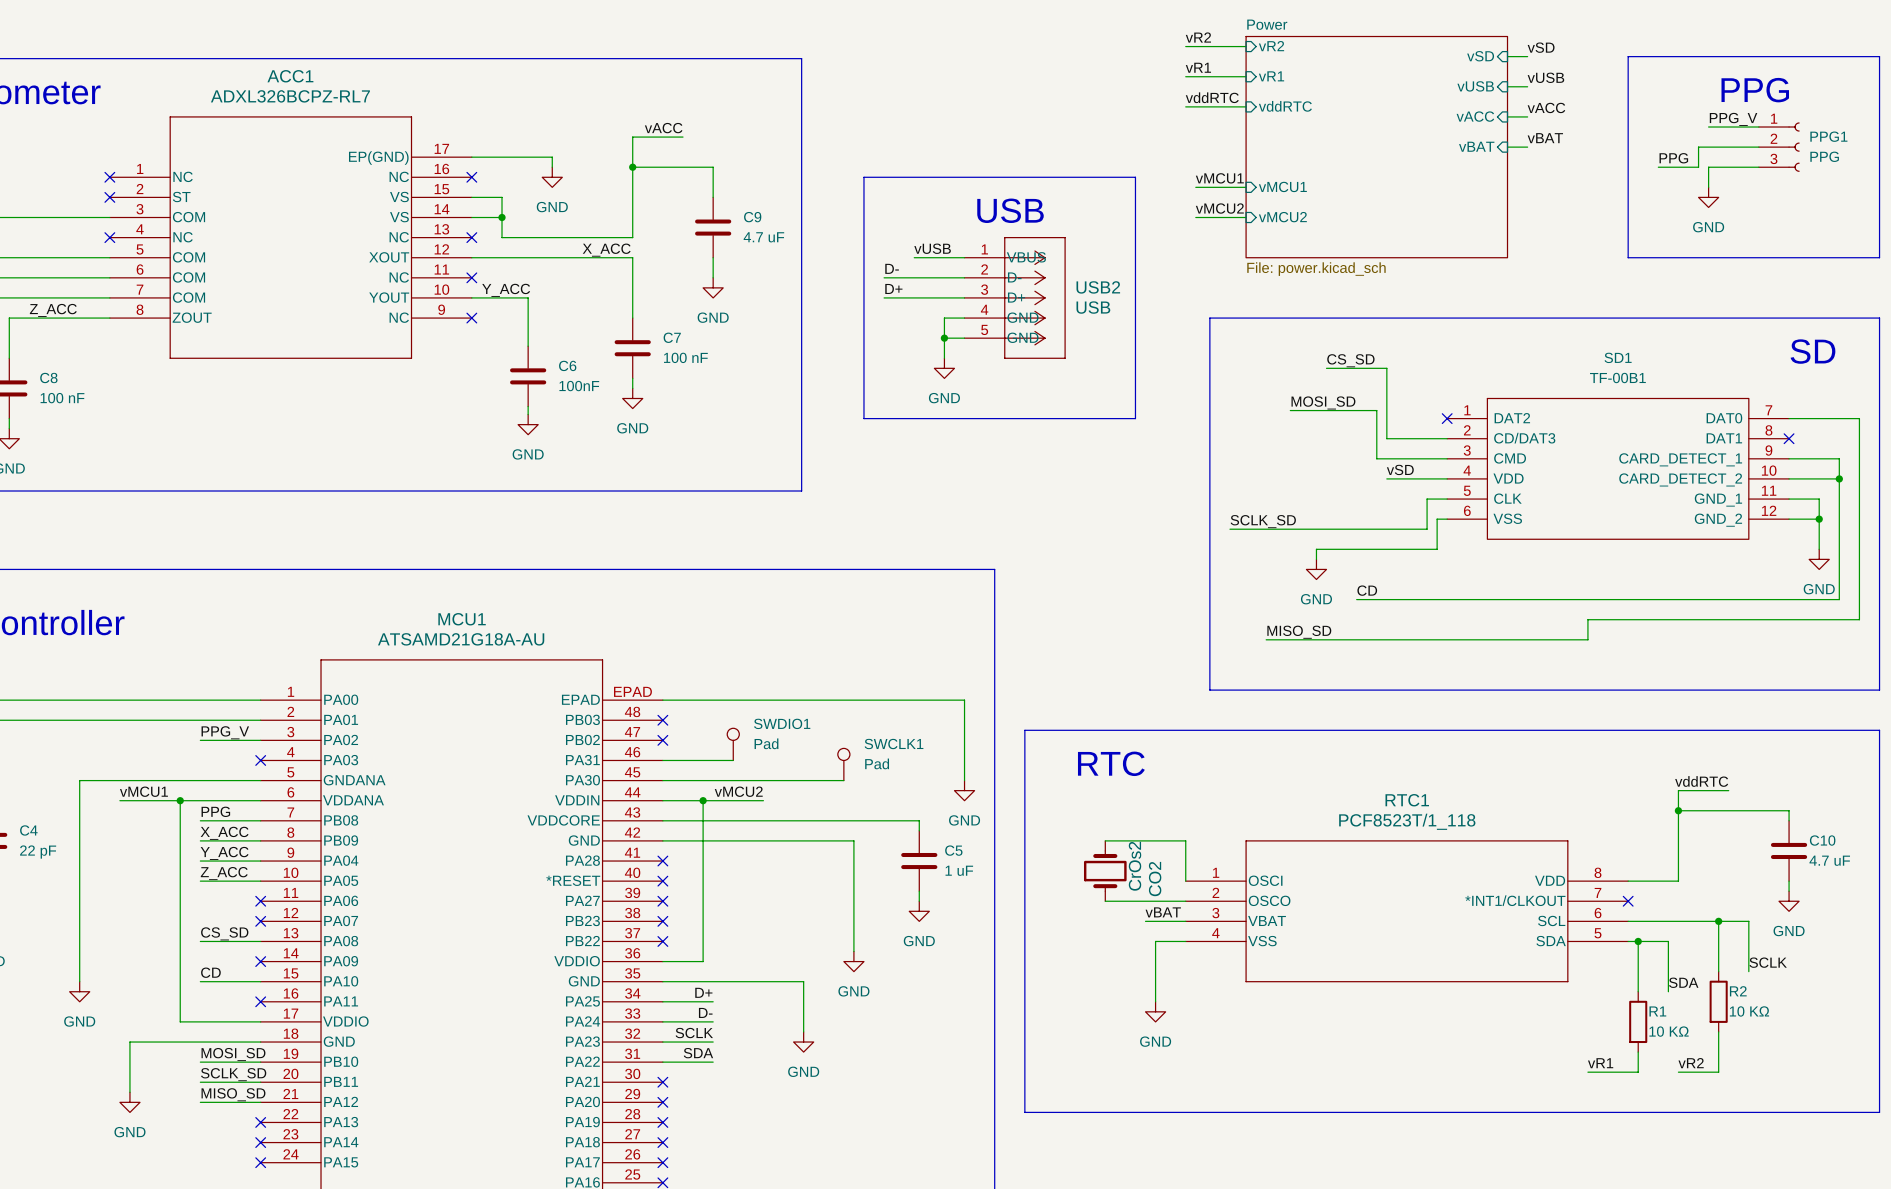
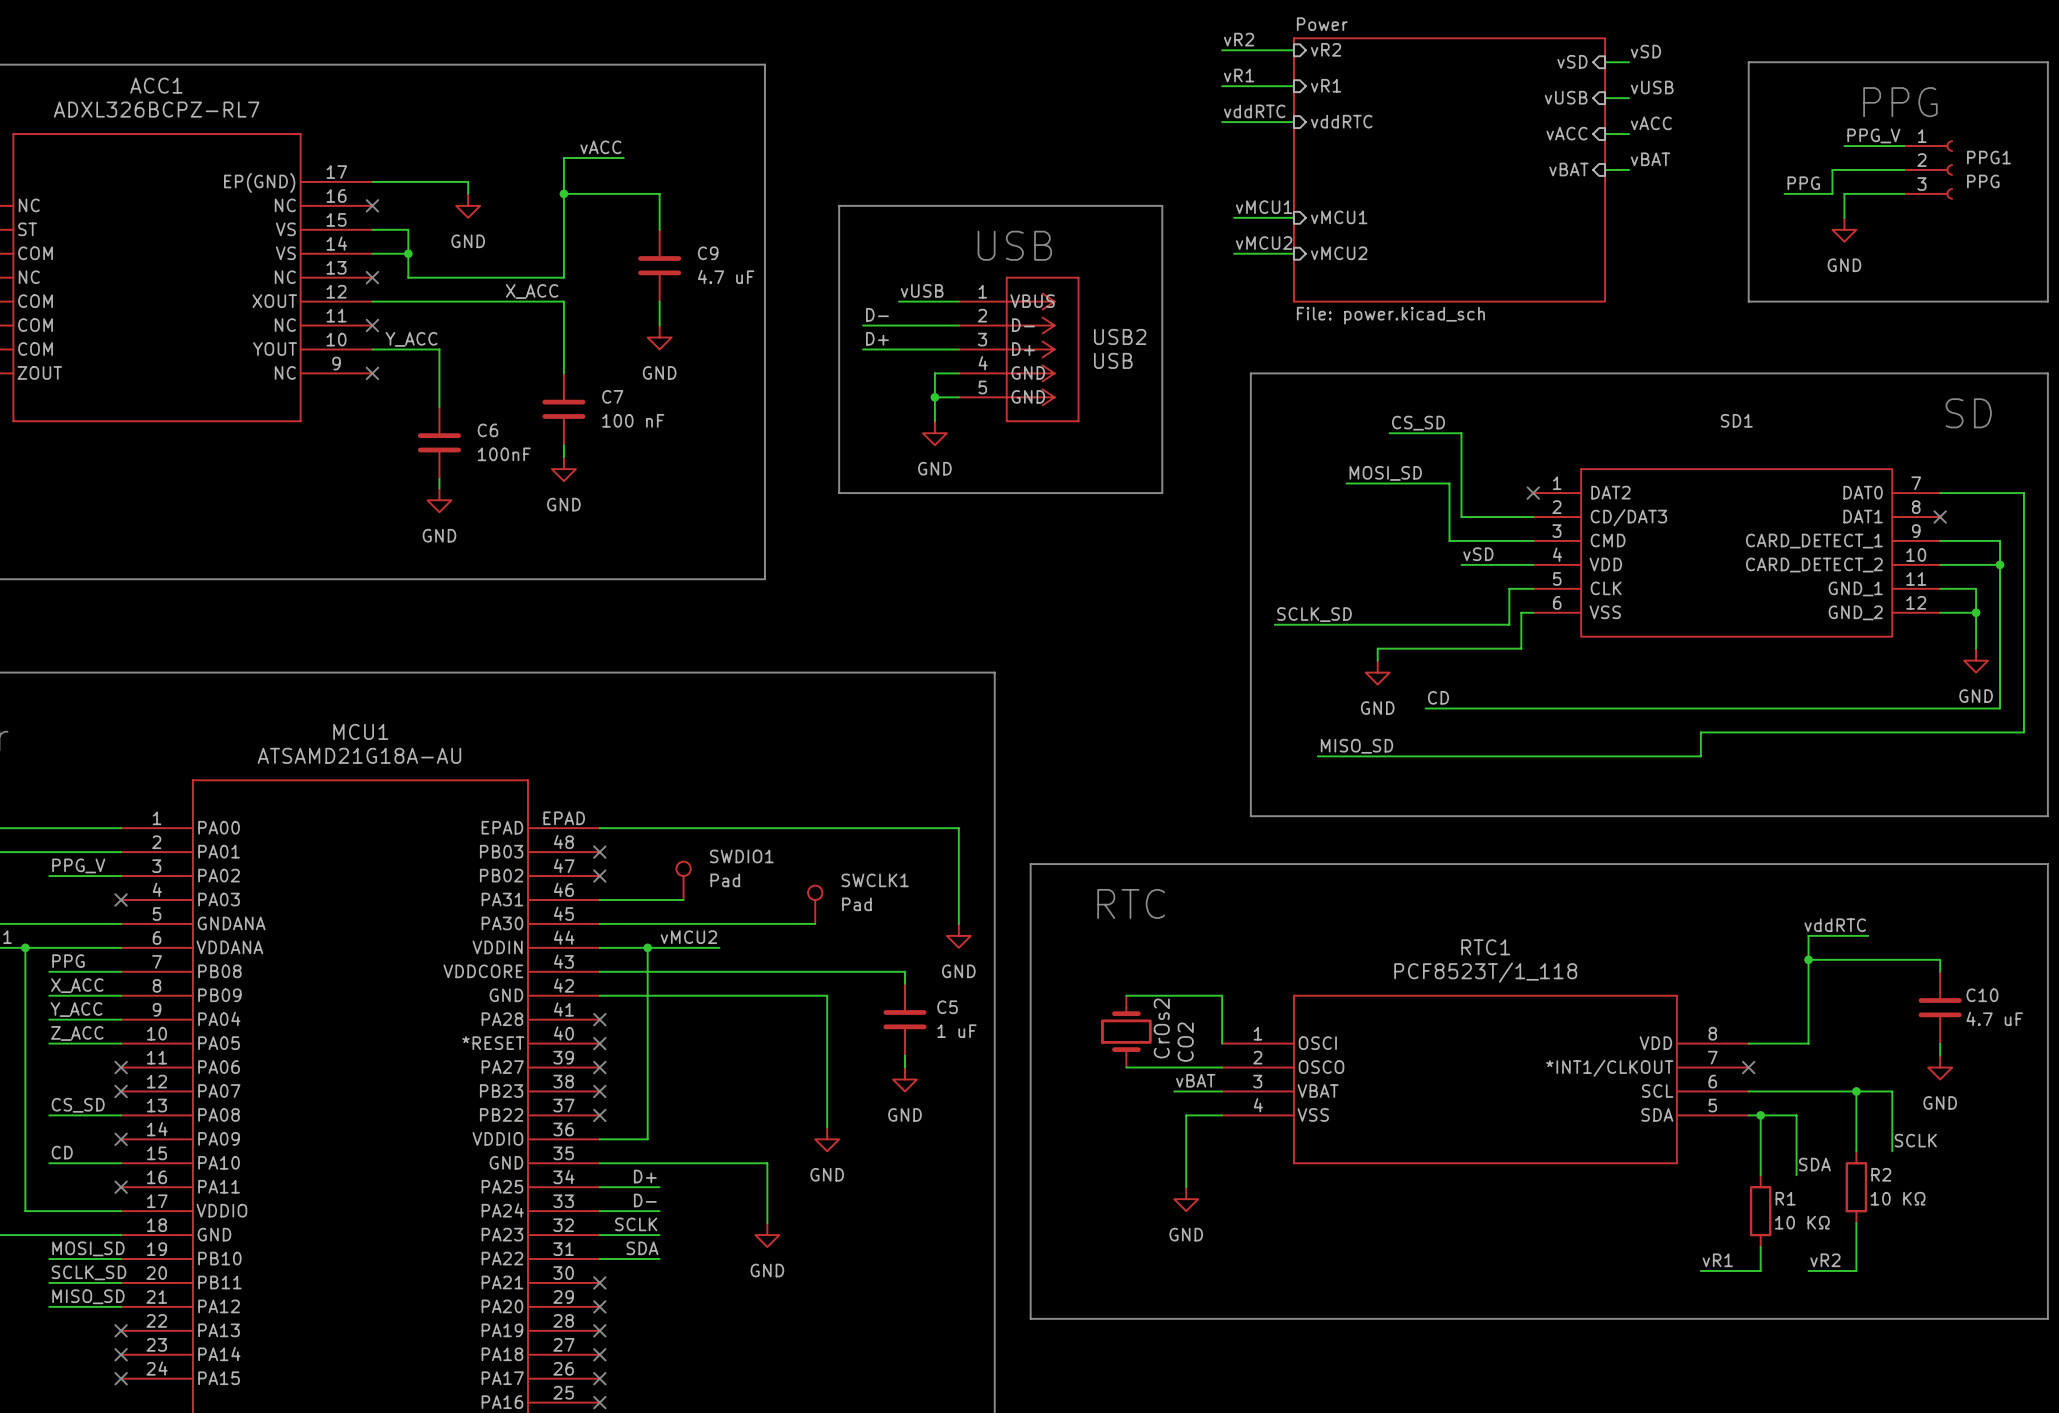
SD1 value: TF-00B1 (1617, 378) -> none

